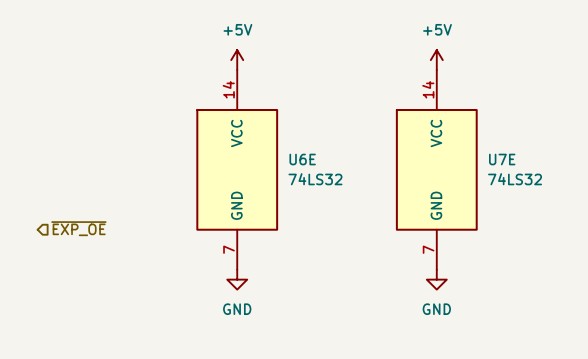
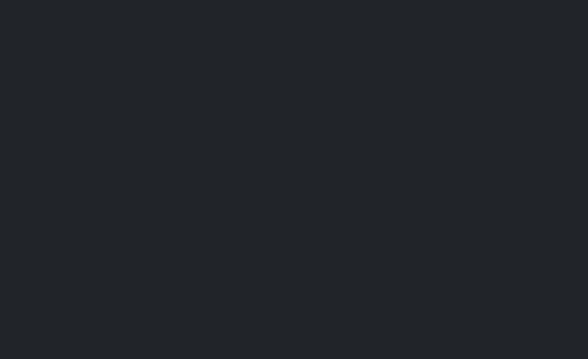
power symbol: +5V (237, 60) -> none
power symbol: +5V (436, 60) -> none
U6E: 74LS32 (237, 169) -> none
U7E: 74LS32 (436, 169) -> none
hierarchical label: ~{EXP_OE} (78, 228) -> none
power symbol: GND (237, 279) -> none
power symbol: GND (436, 279) -> none

